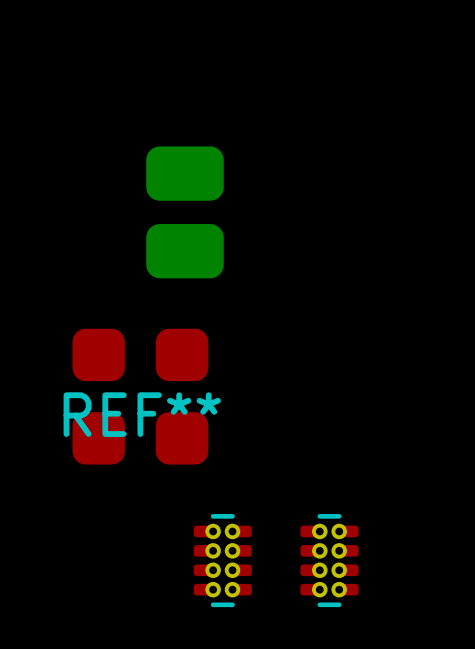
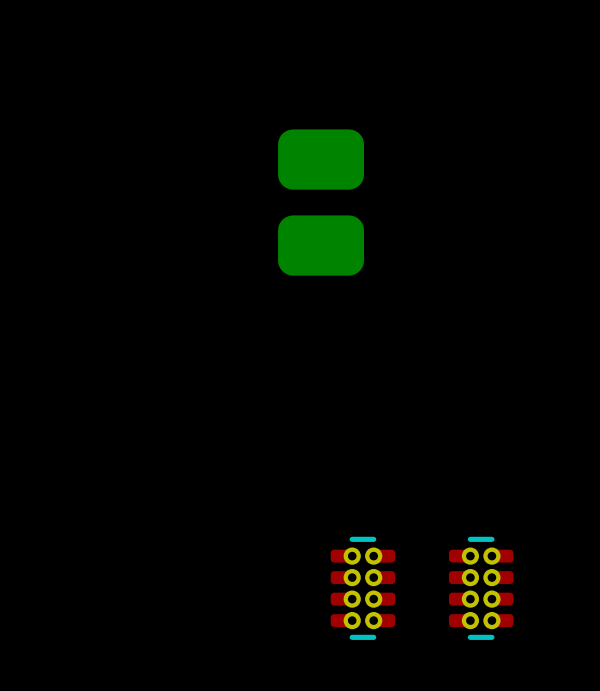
REF**: (140, 396) -> none

